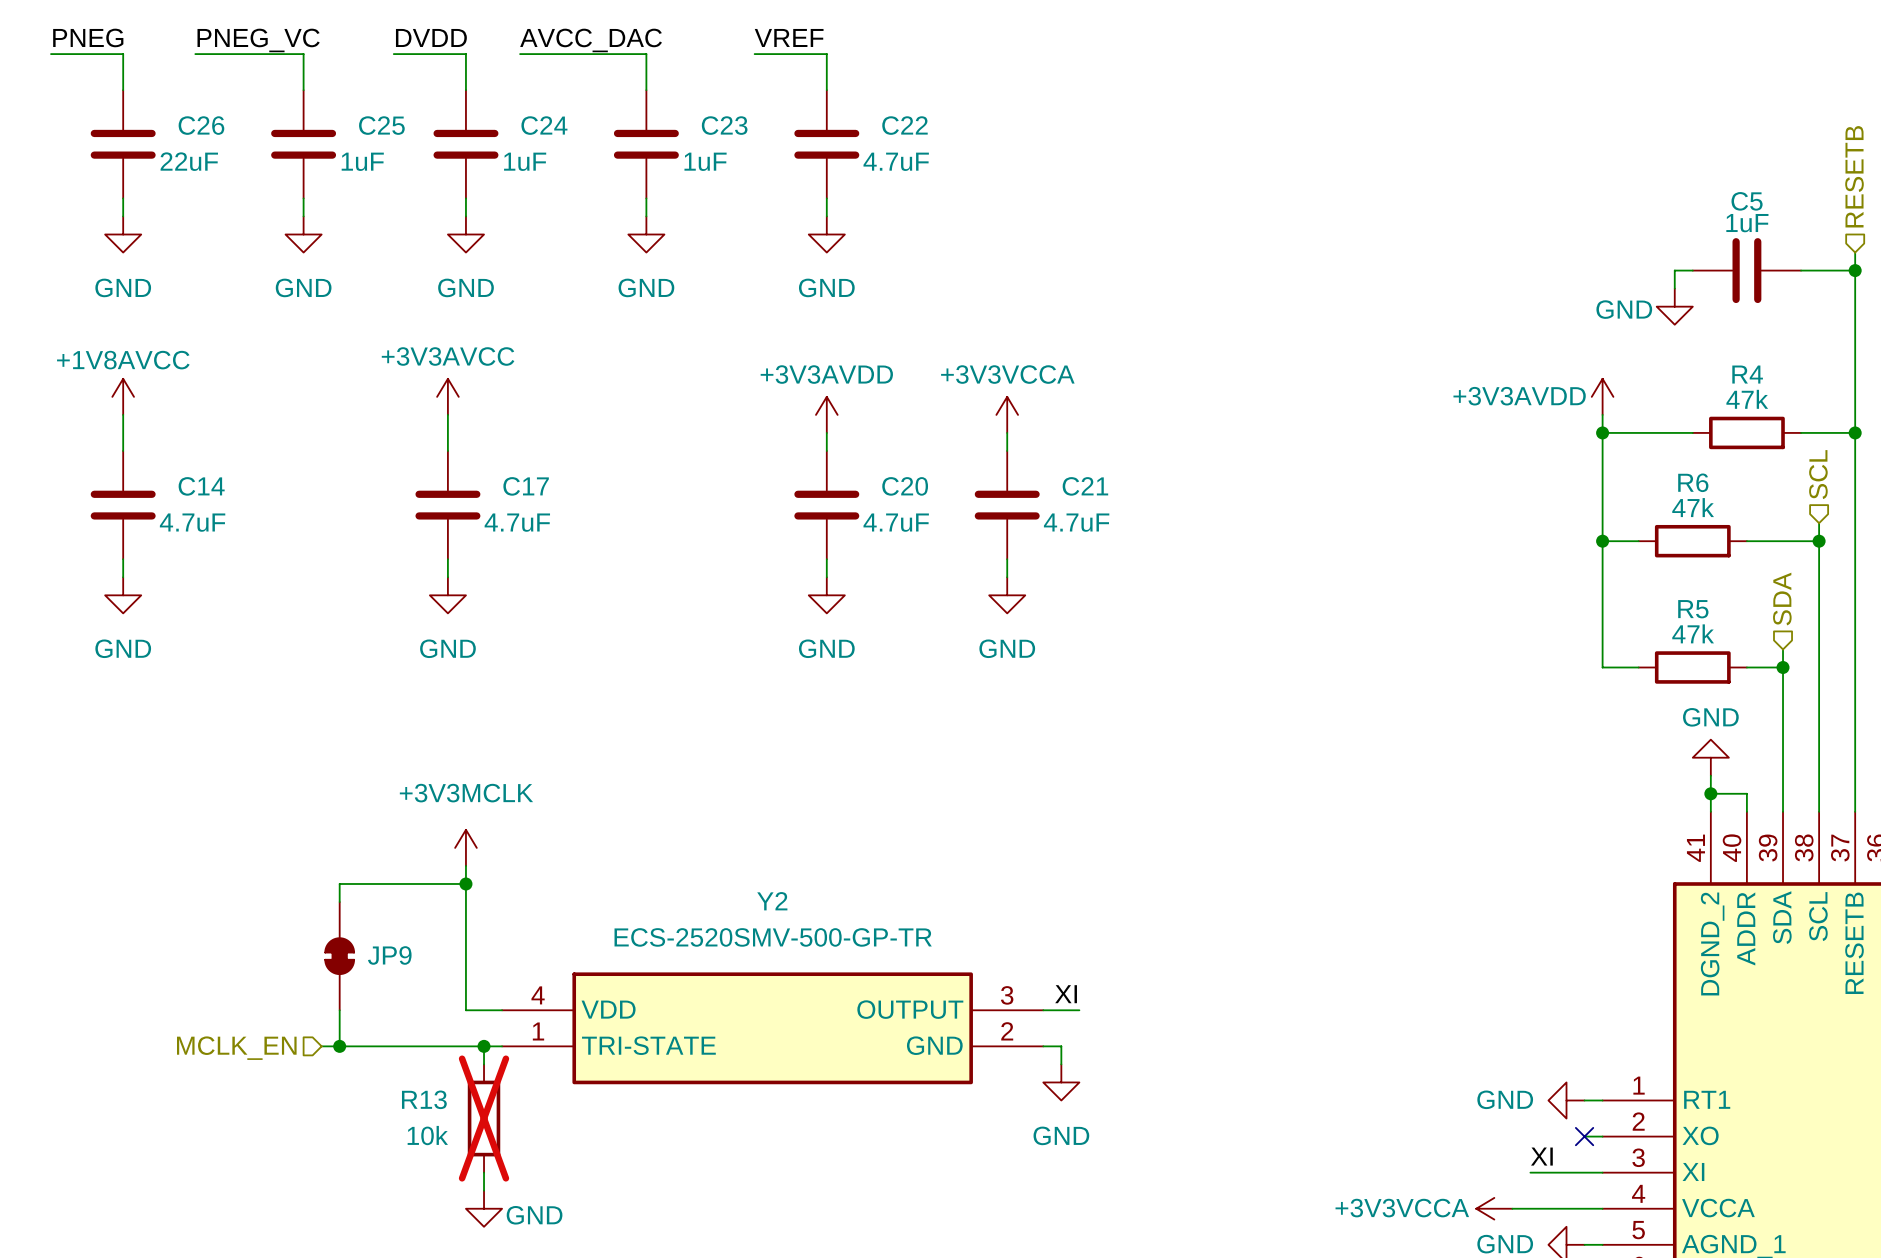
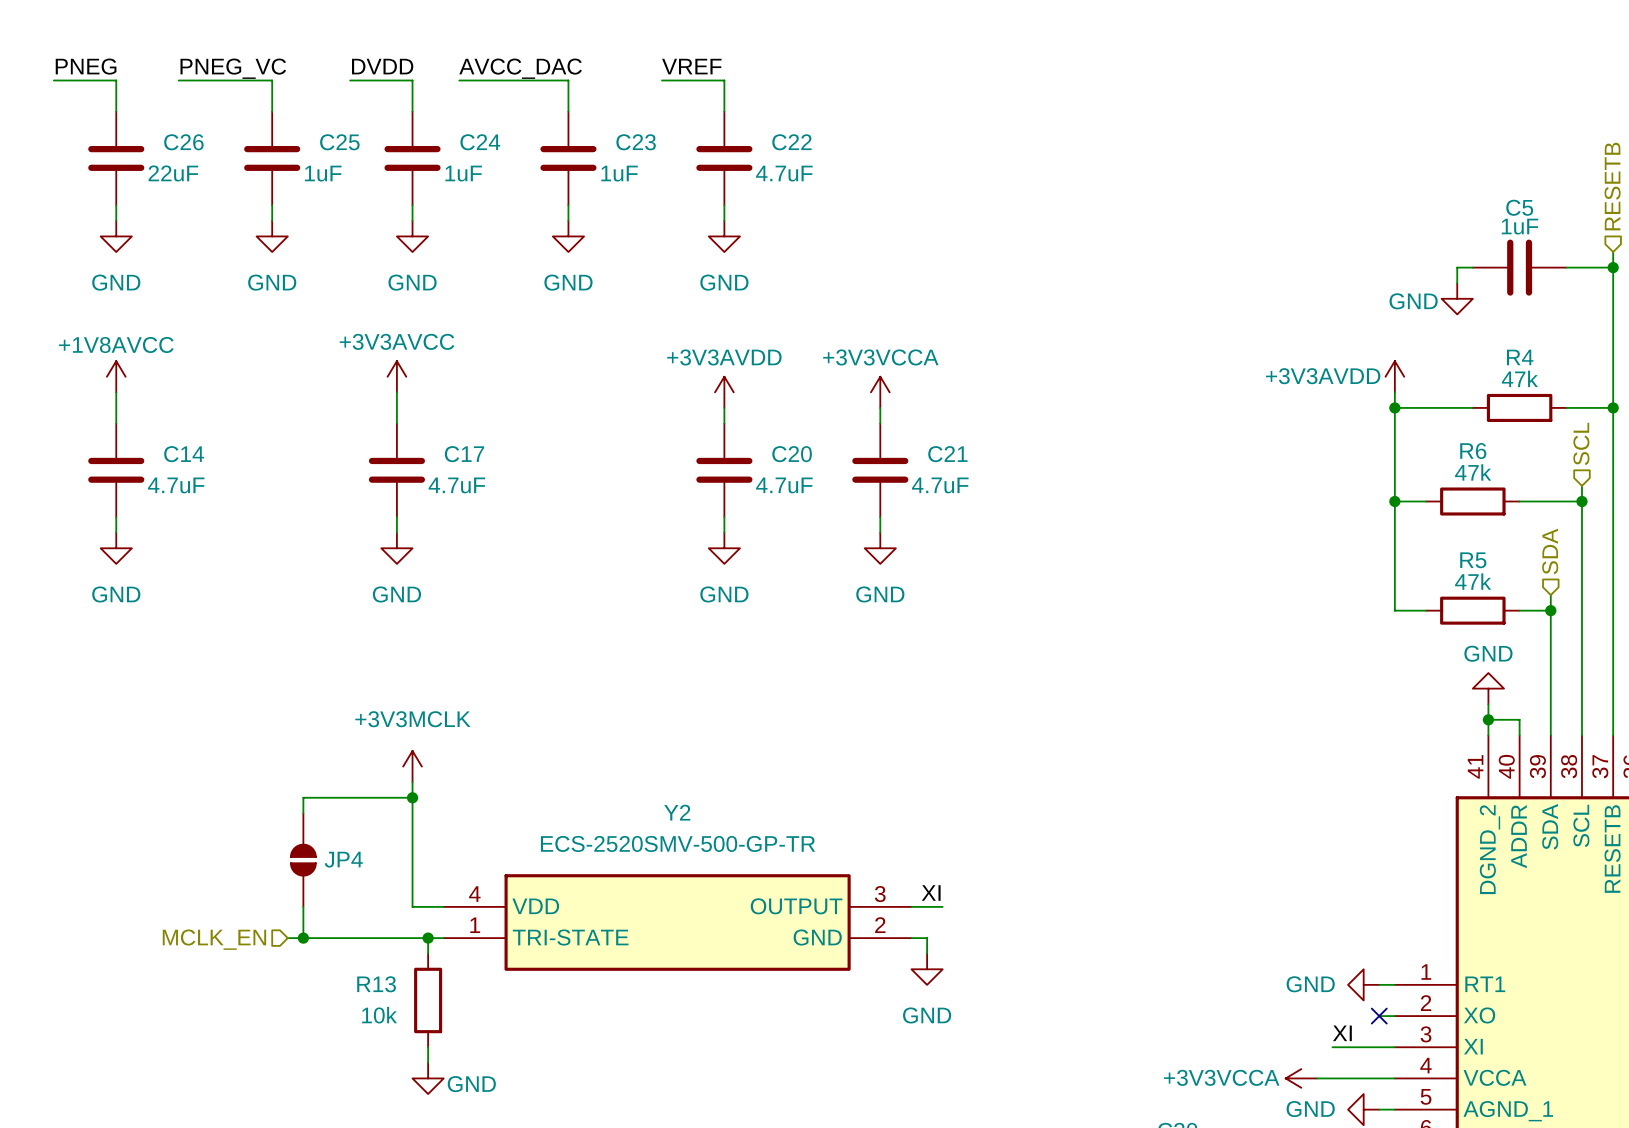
JP9: (339, 956) -> none
JP4: none -> (303, 860)
R13 do-not-place cross: (484, 1118) -> none

